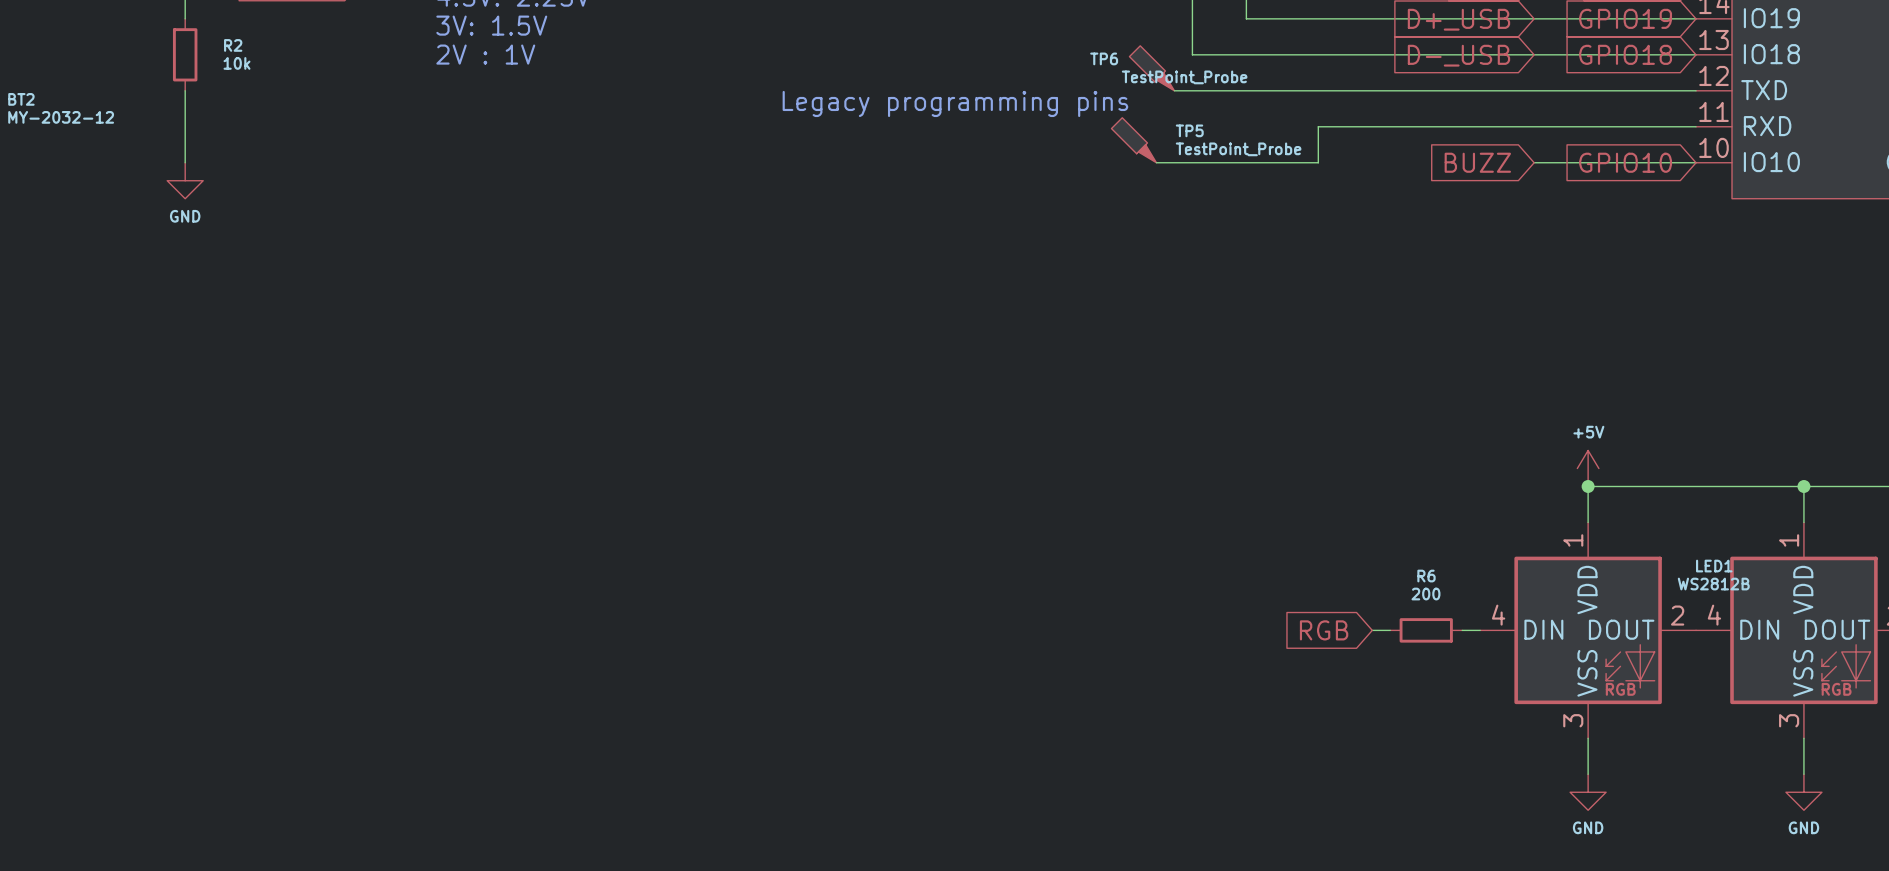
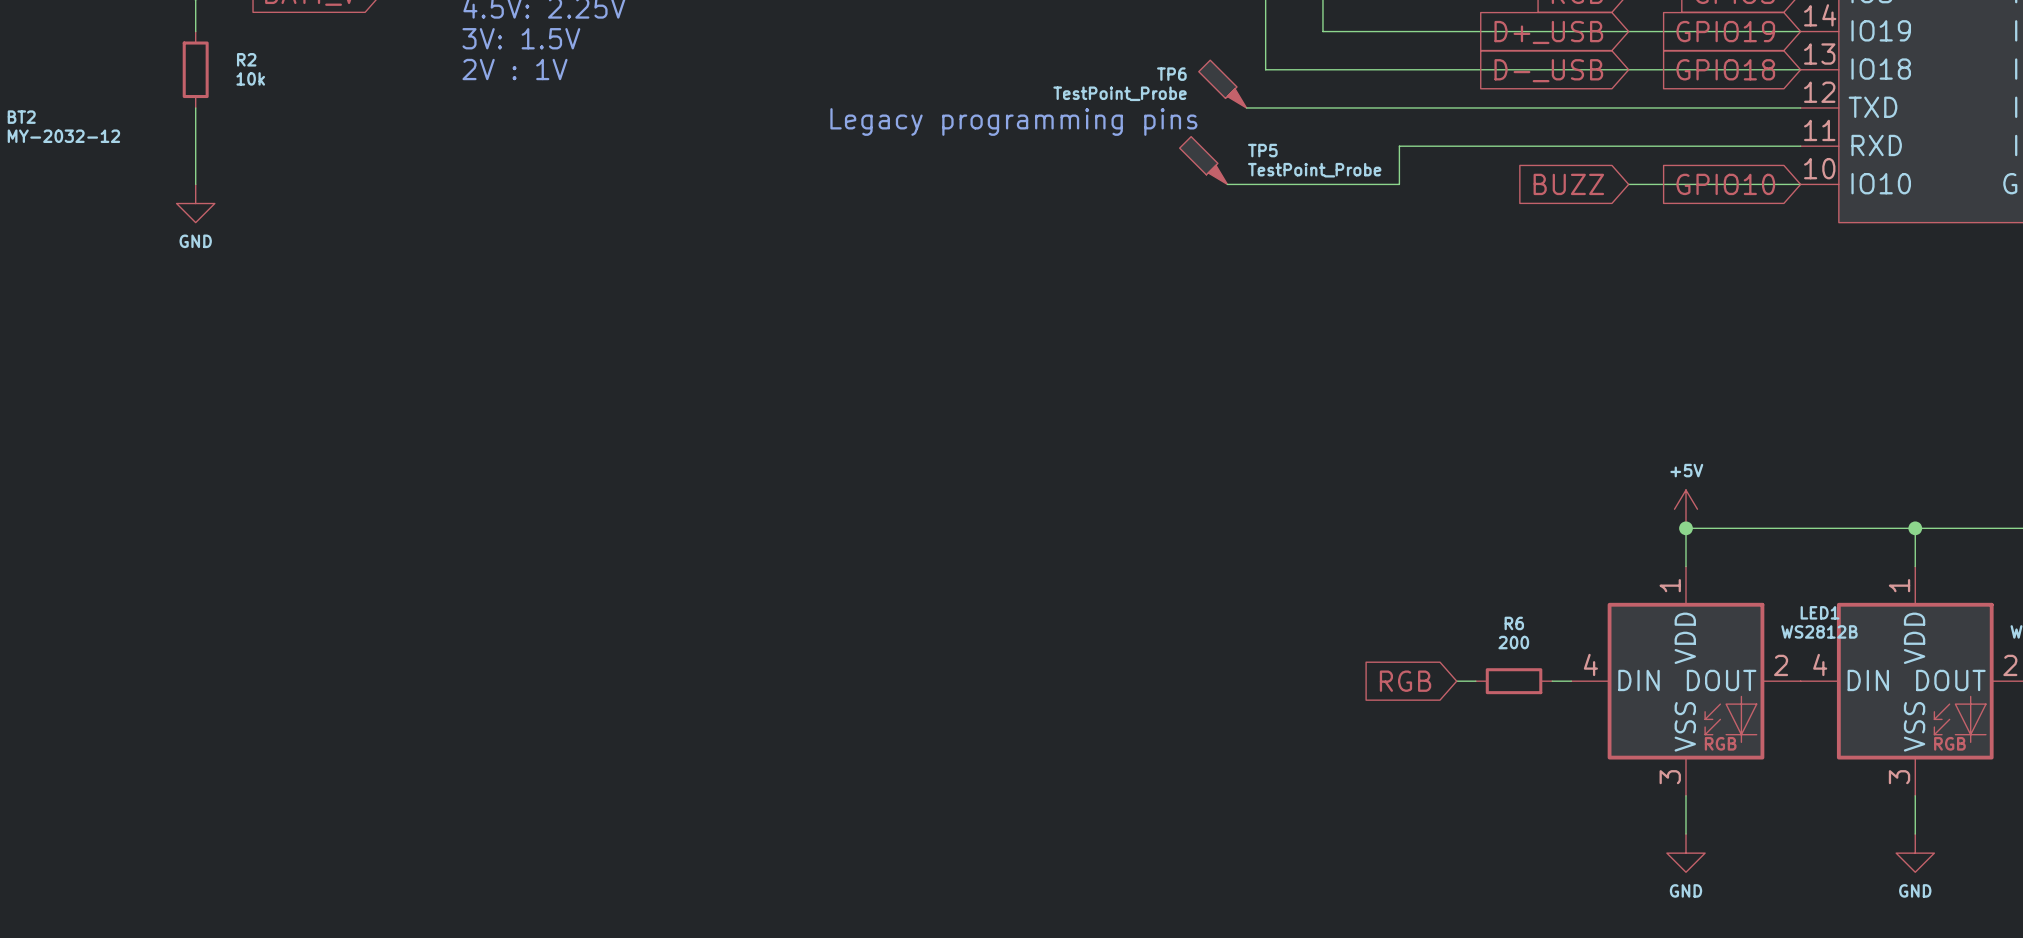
TP6 value position: TestPoint_Probe (1184, 77) -> TestPoint_Probe (1120, 93)

